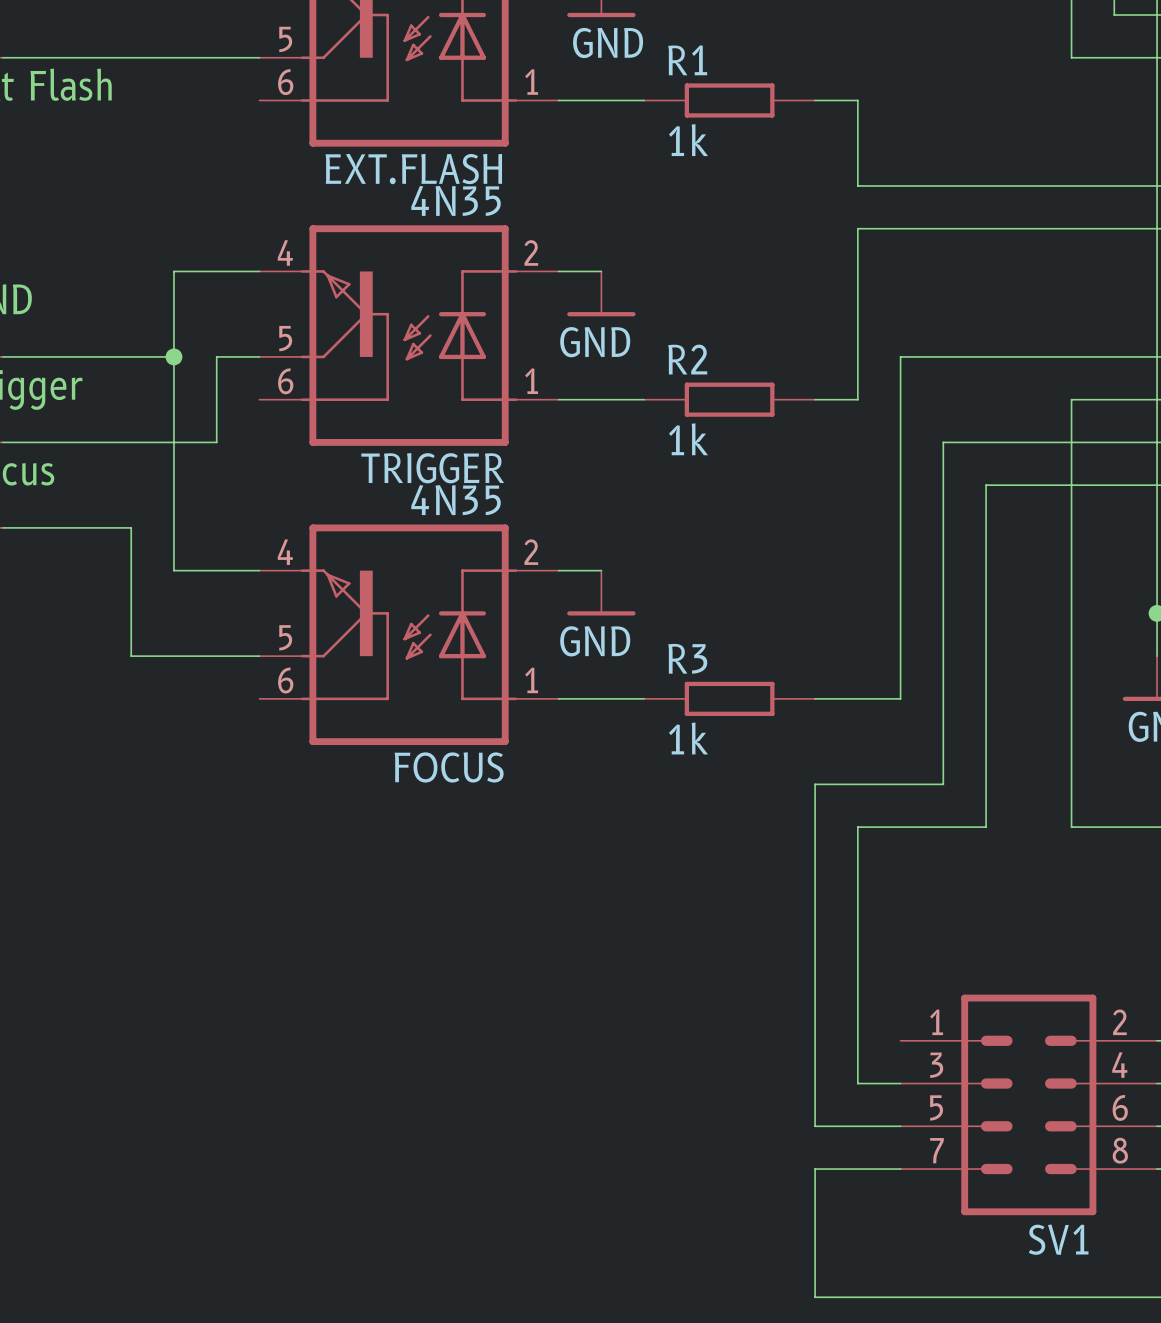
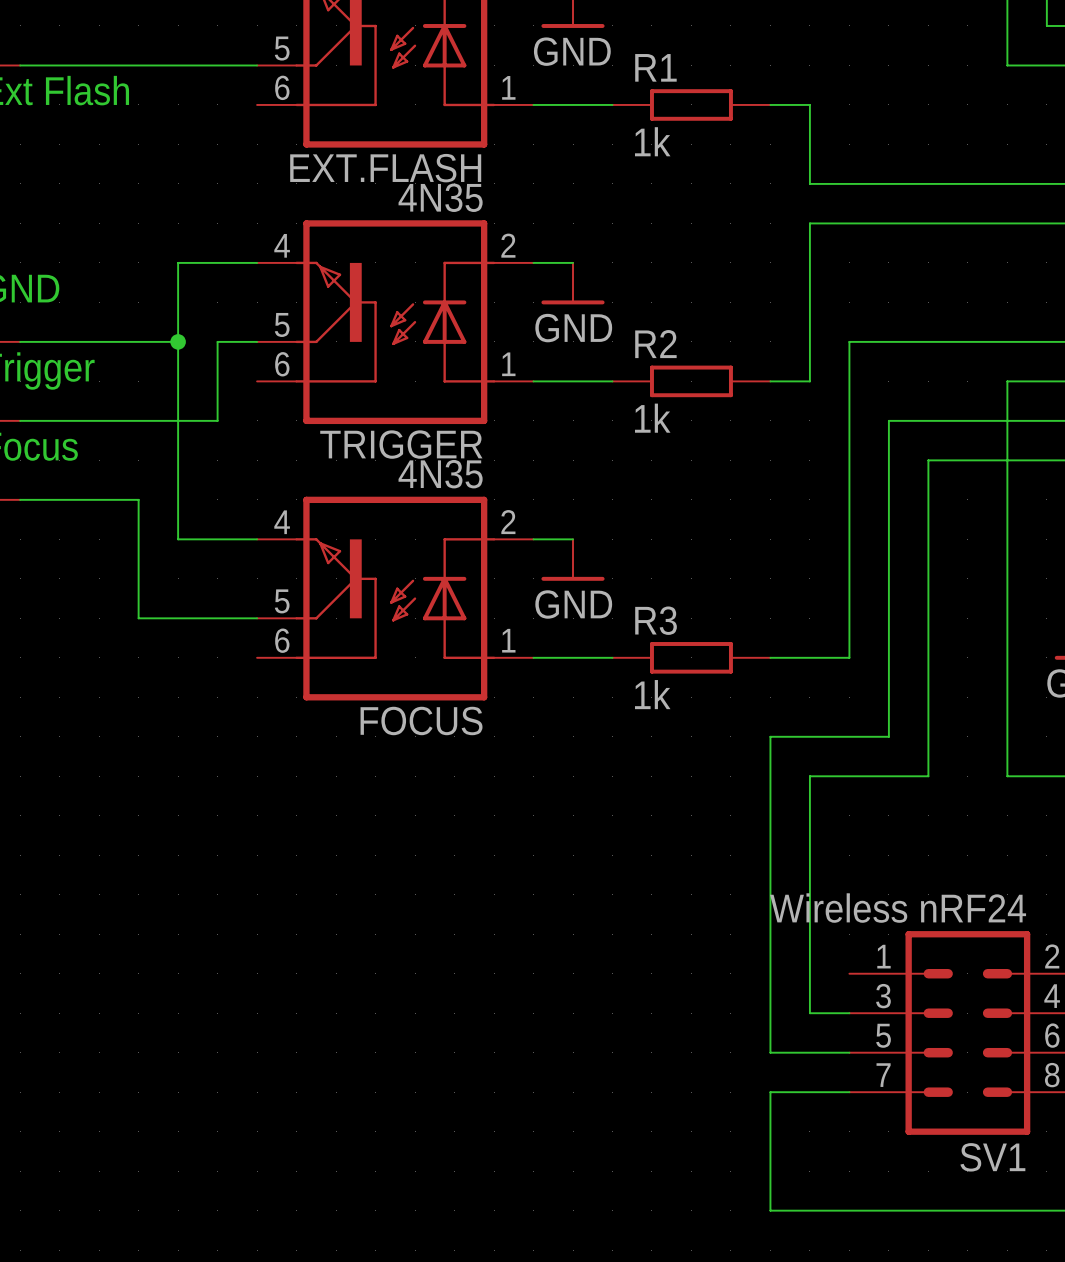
SV1 value: none -> Wireless nRF24 (898, 908)

